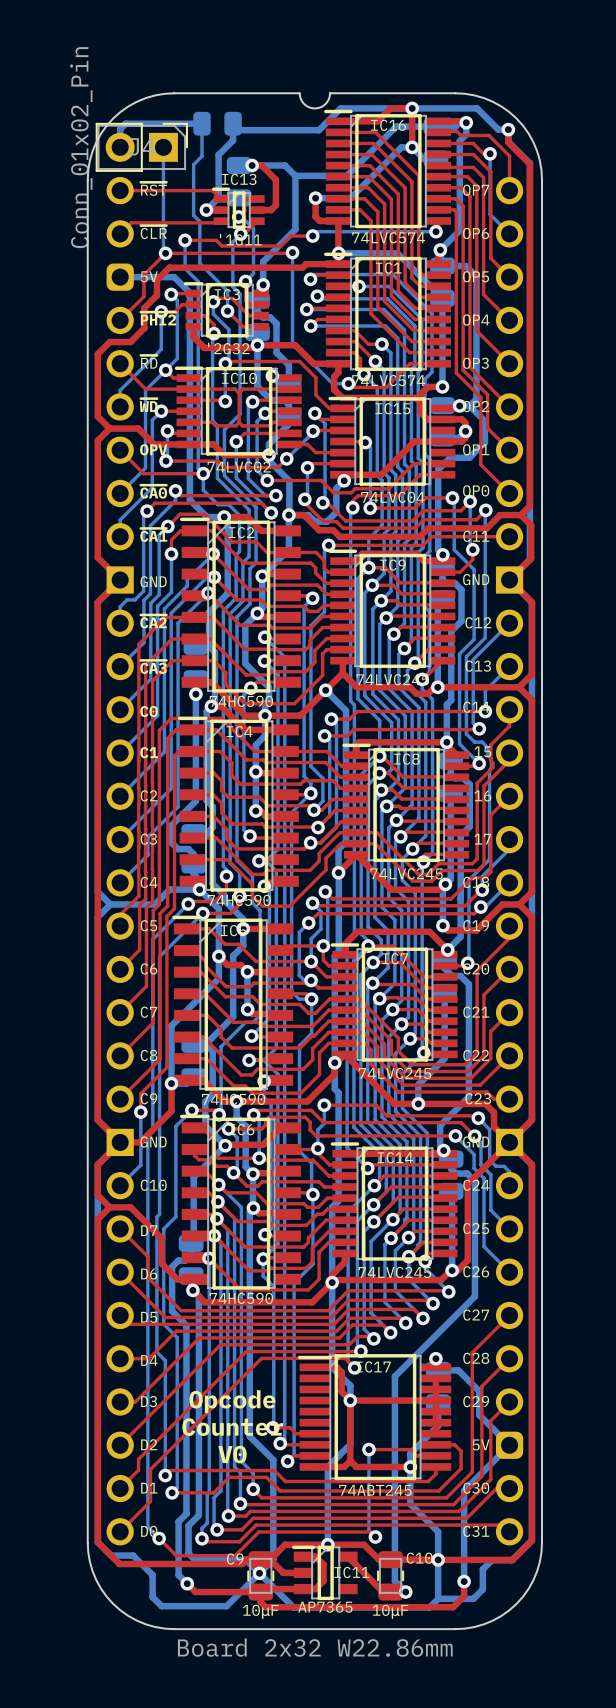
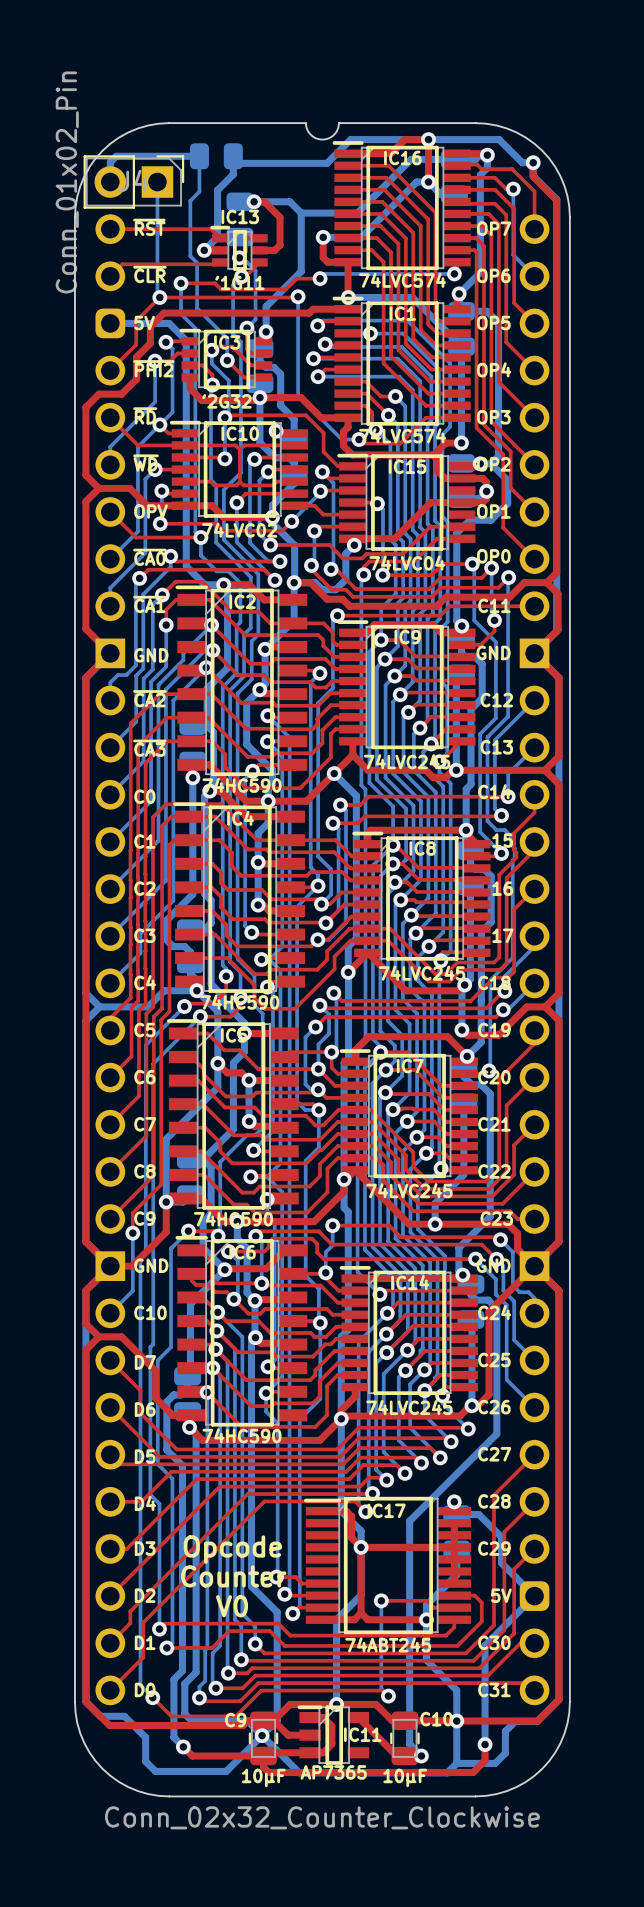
part value: Board 2x32 W22.86mm (315, 1647) -> Conn_02x32_Counter_Clockwise (322, 1817)

